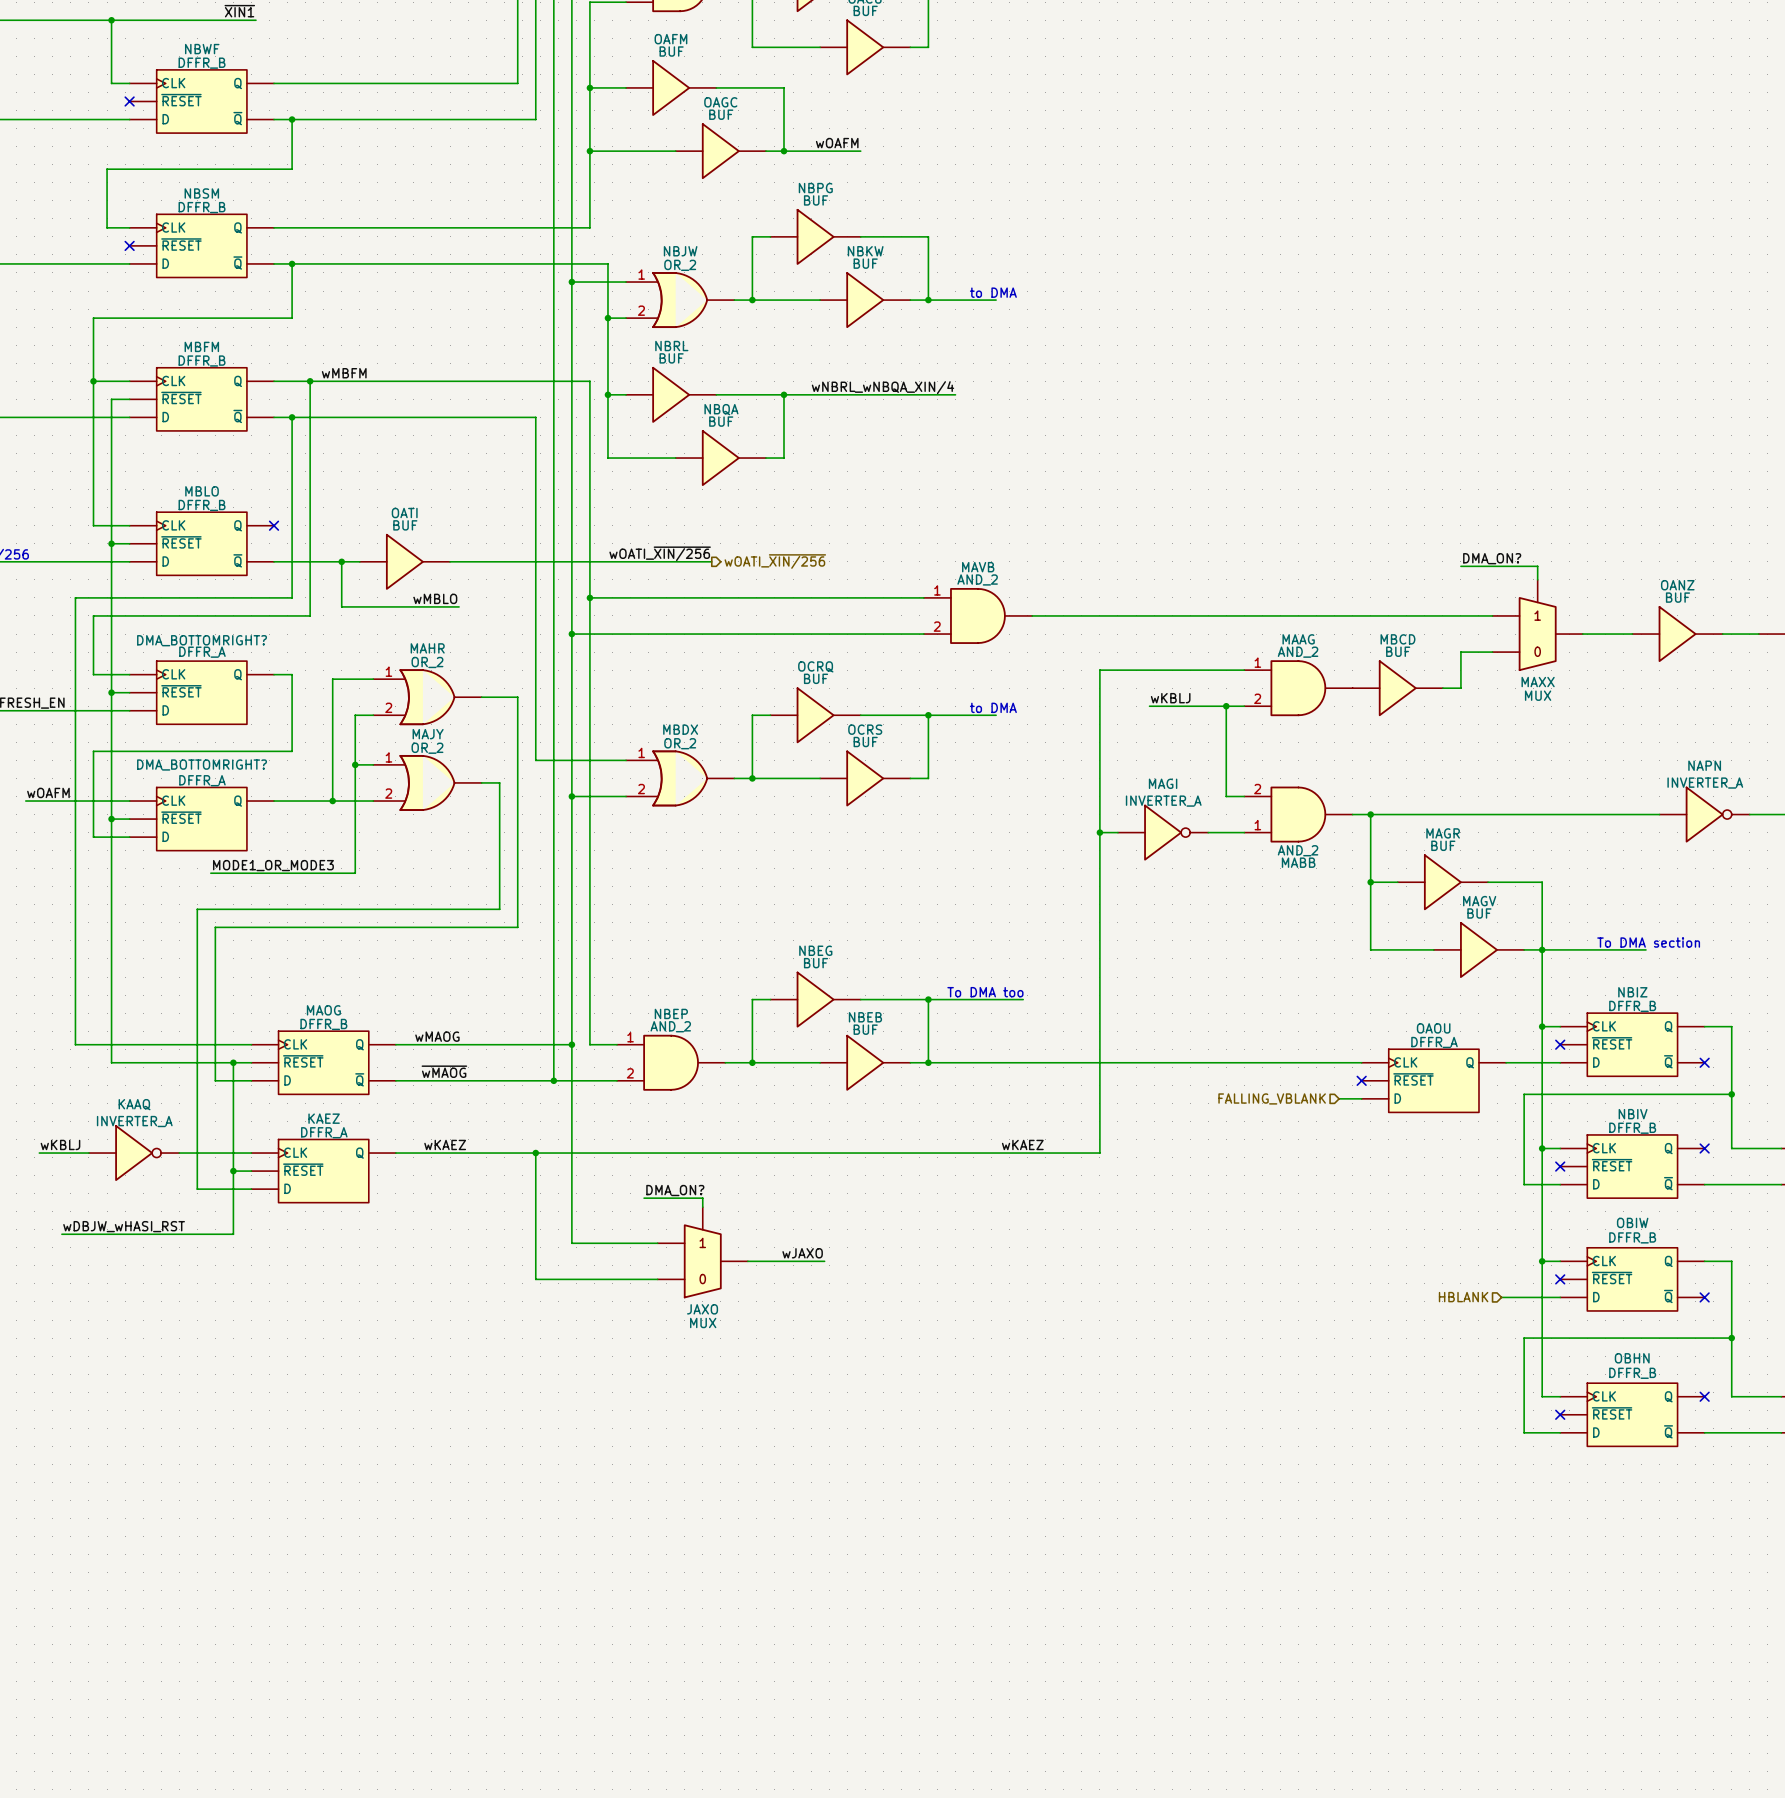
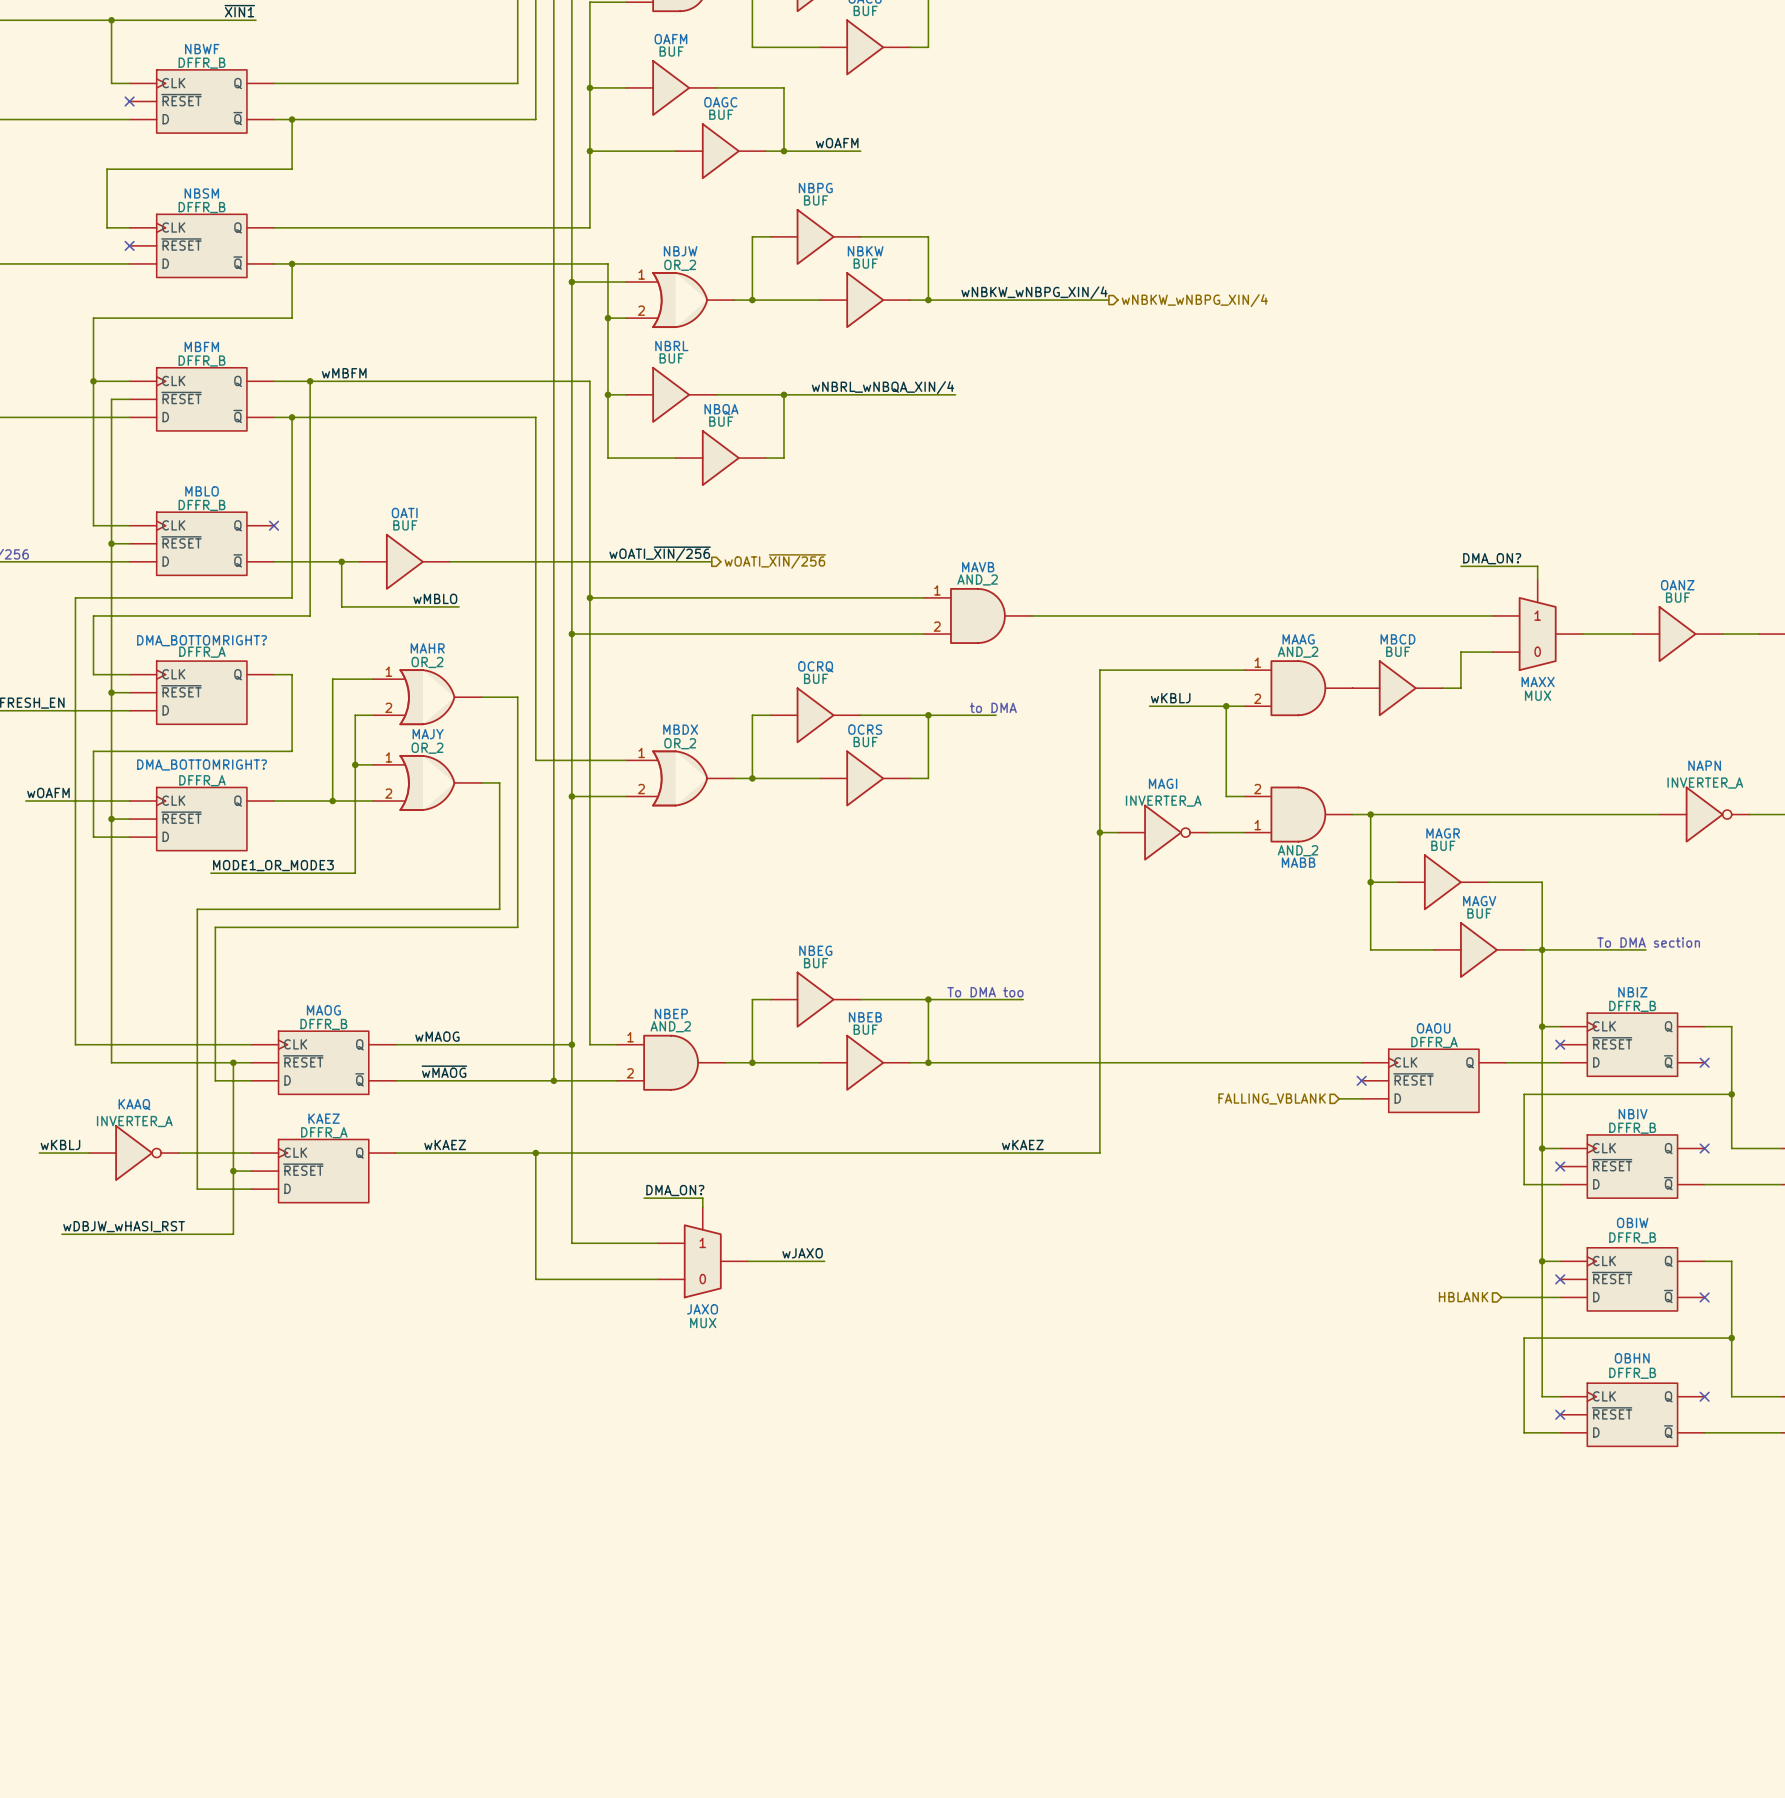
text: to DMA (993, 292) -> none
label: none -> wNBKW_wNBPG_XIN/4 (1034, 292)
wire: none -> (996, 300) (1108, 300)
hierarchical label: none -> wNBKW_wNBPG_XIN/4 (1194, 300)

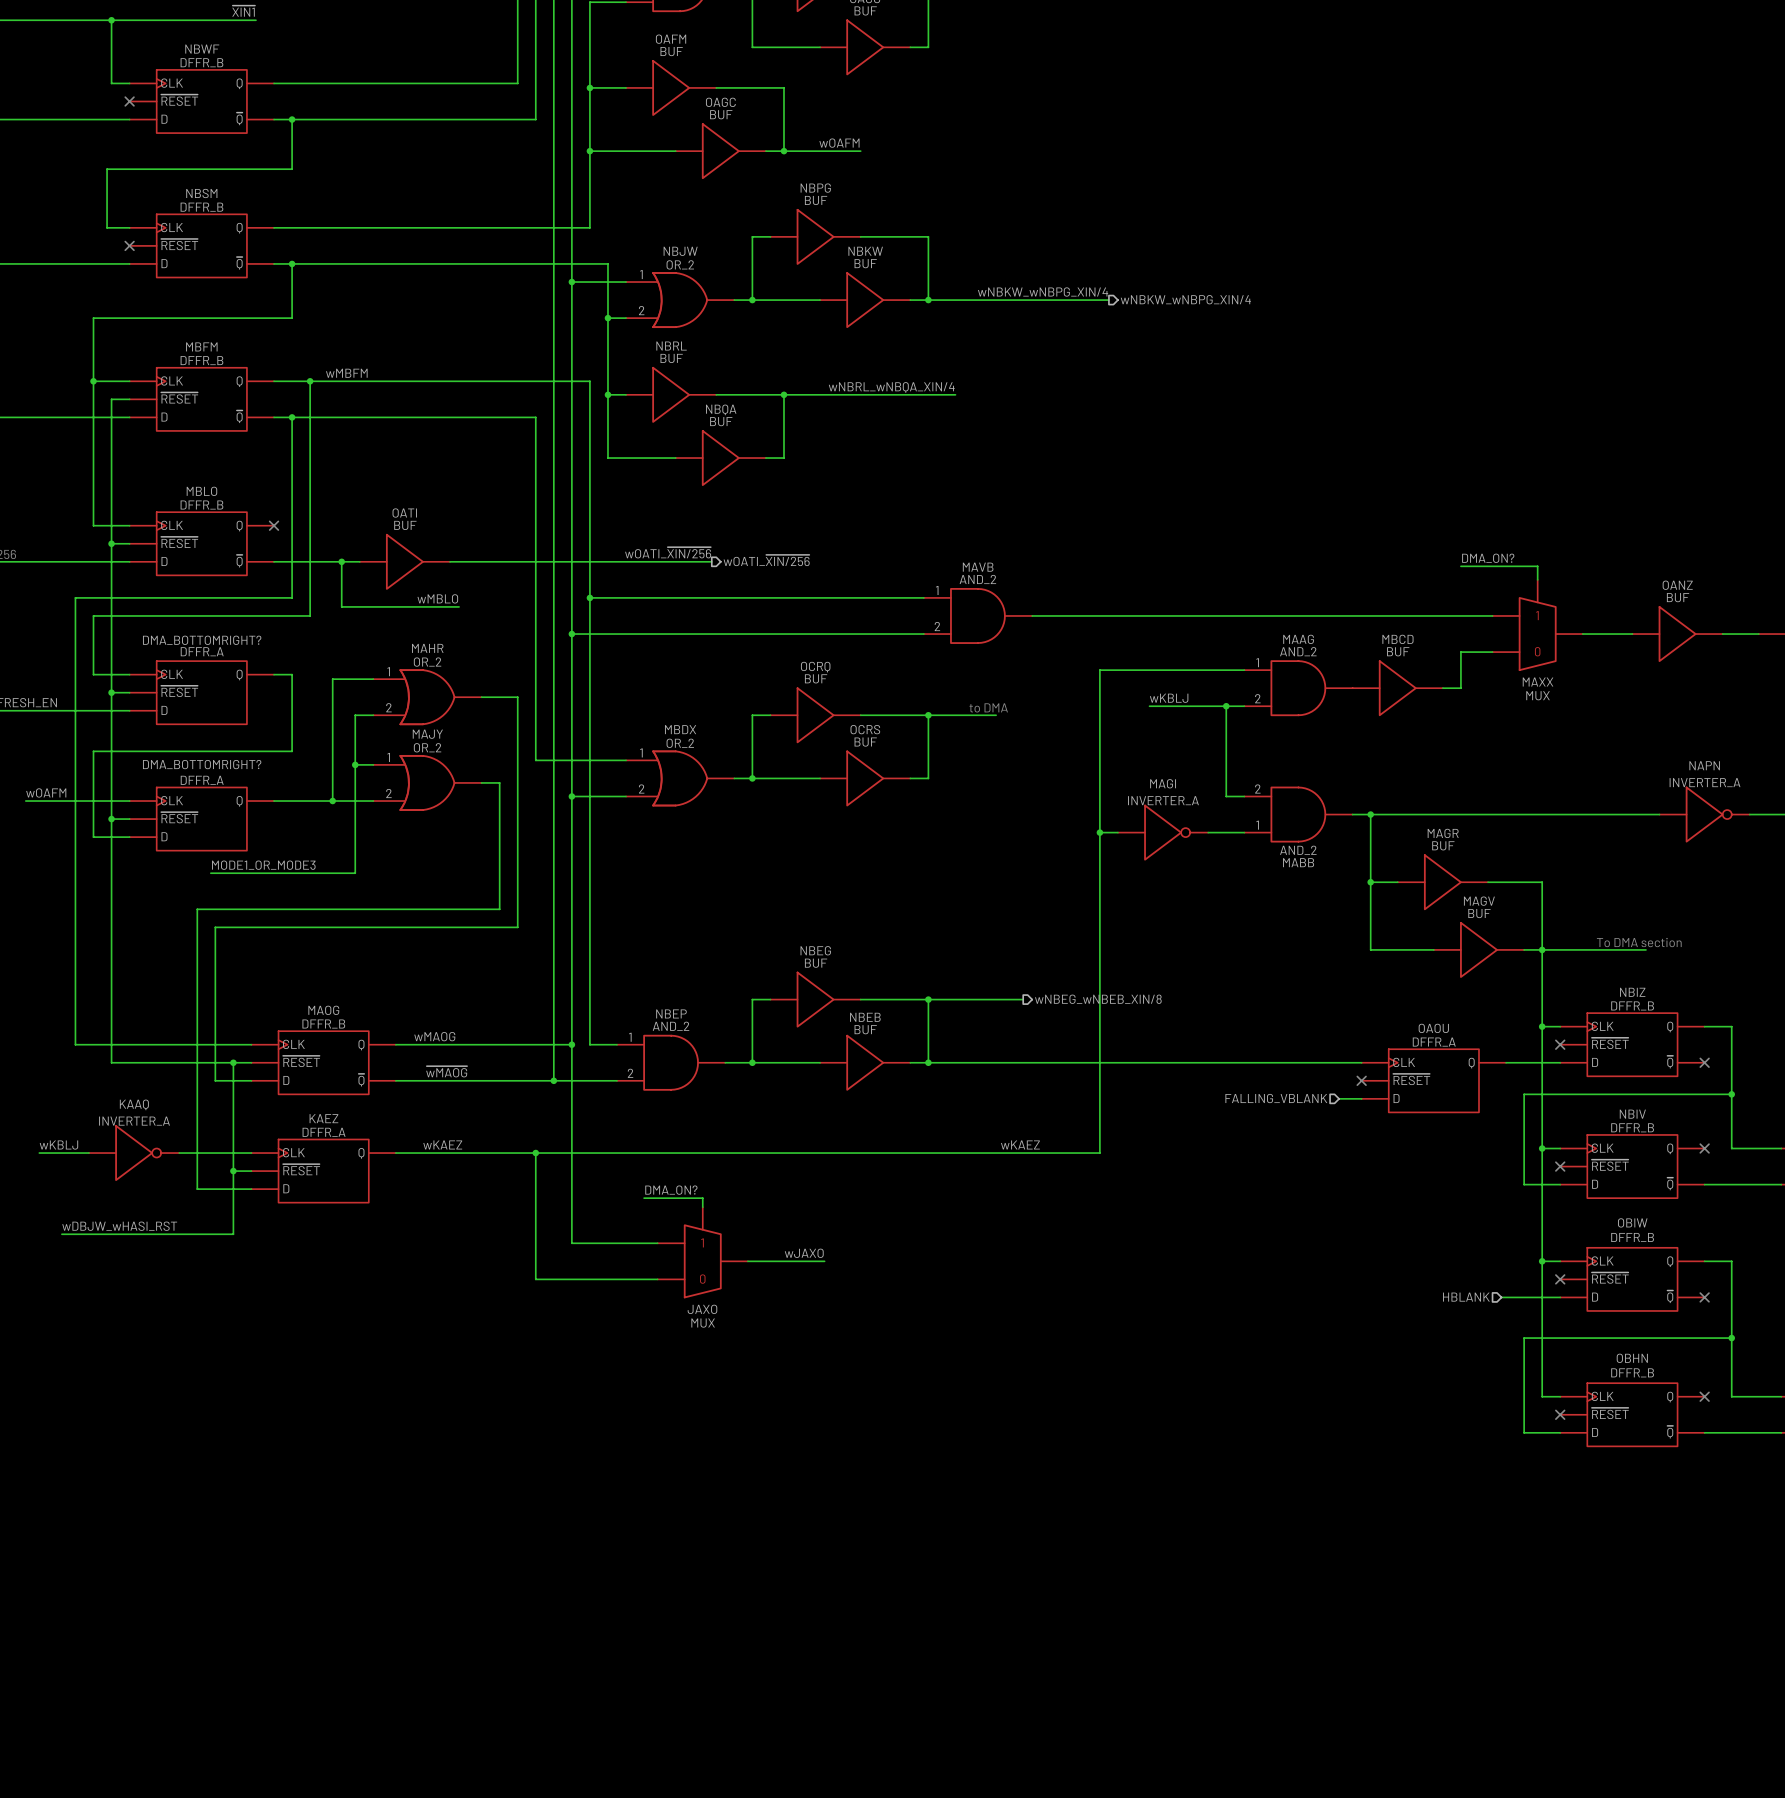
text: To DMA too (985, 992) -> none
hierarchical label: none -> wNBEG_wNBEB_XIN/8 (1098, 999)

